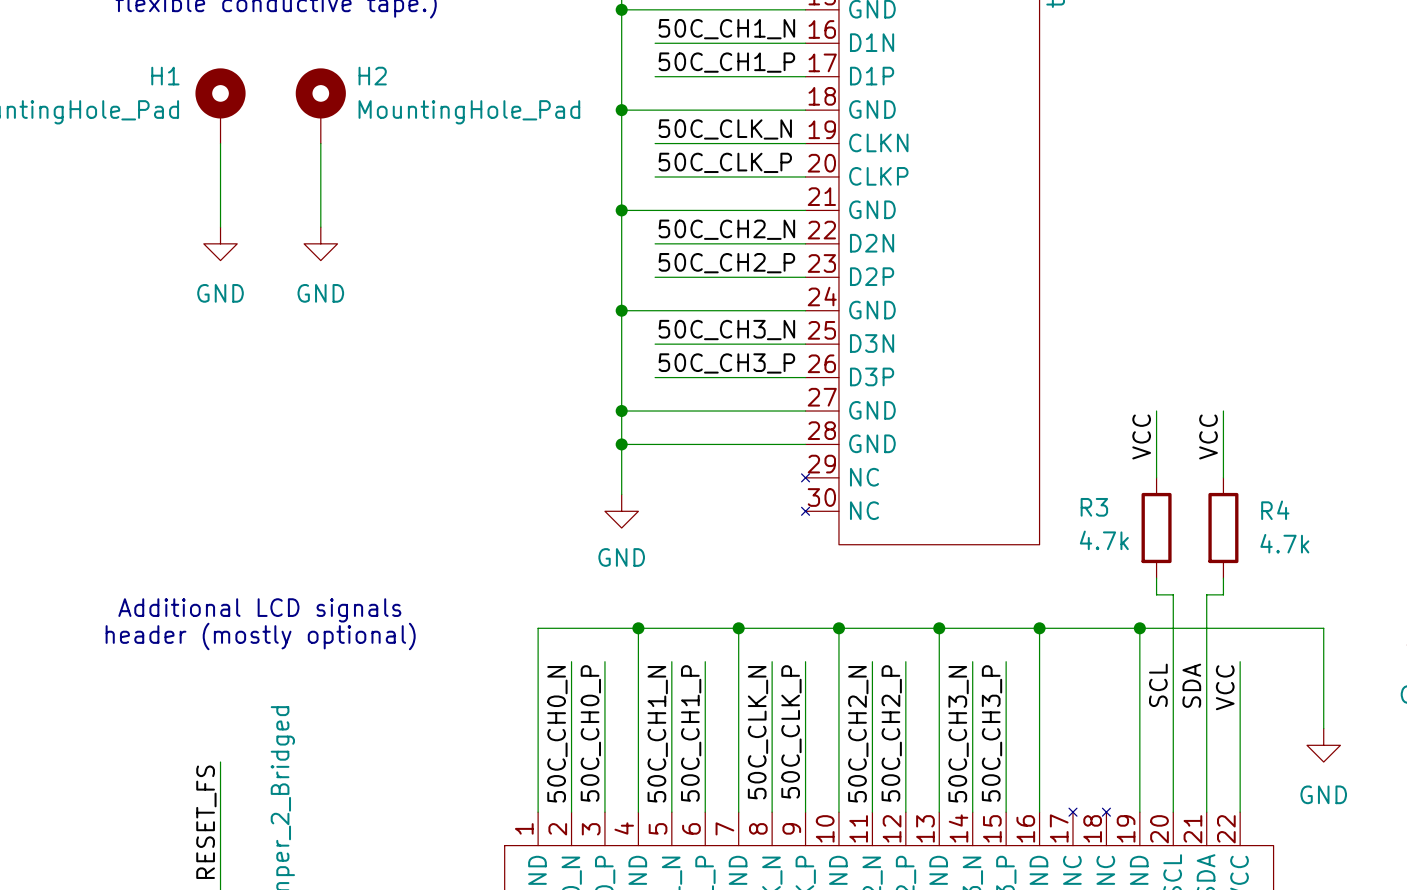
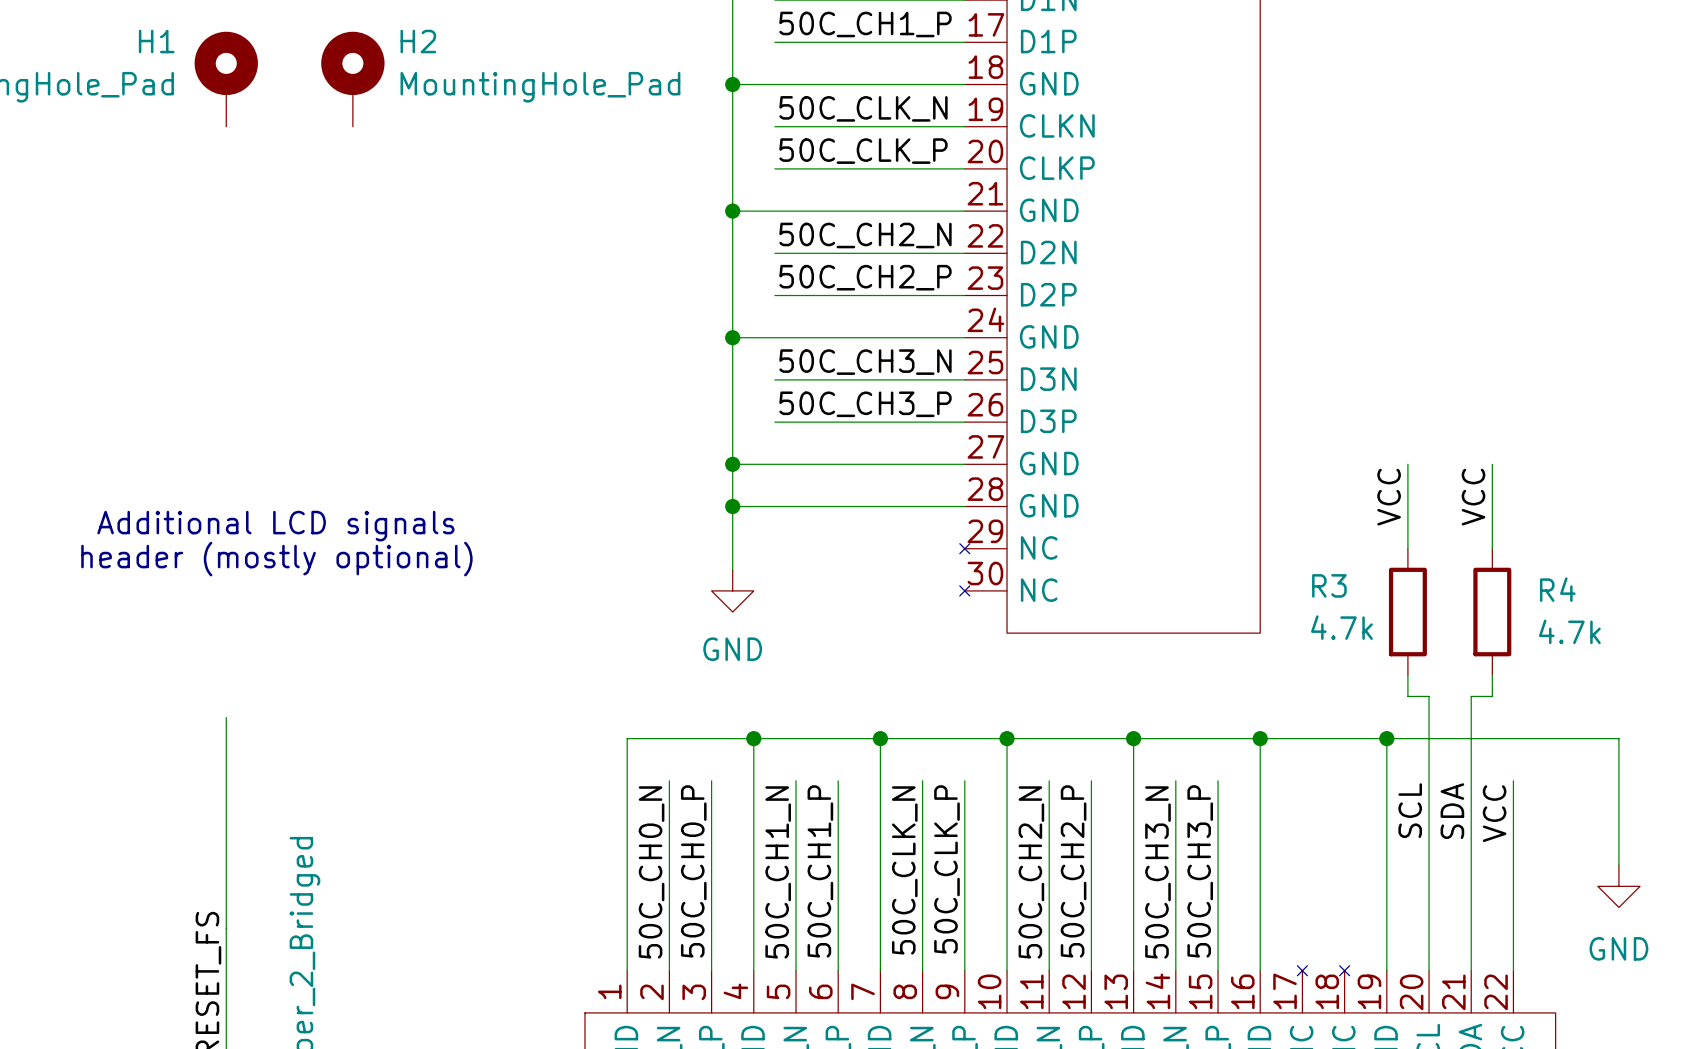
wire: (220, 143) (220, 227) -> none
wire: (320, 143) (320, 227) -> none
power symbol: GND (220, 243) -> none
power symbol: GND (320, 243) -> none
text position: Additional LCD signals (259, 610) -> Additional LCD signals (275, 526)
wire: none -> (226, 717) (226, 907)
text position: header (mostly optional) (260, 636) -> header (mostly optional) (276, 559)

